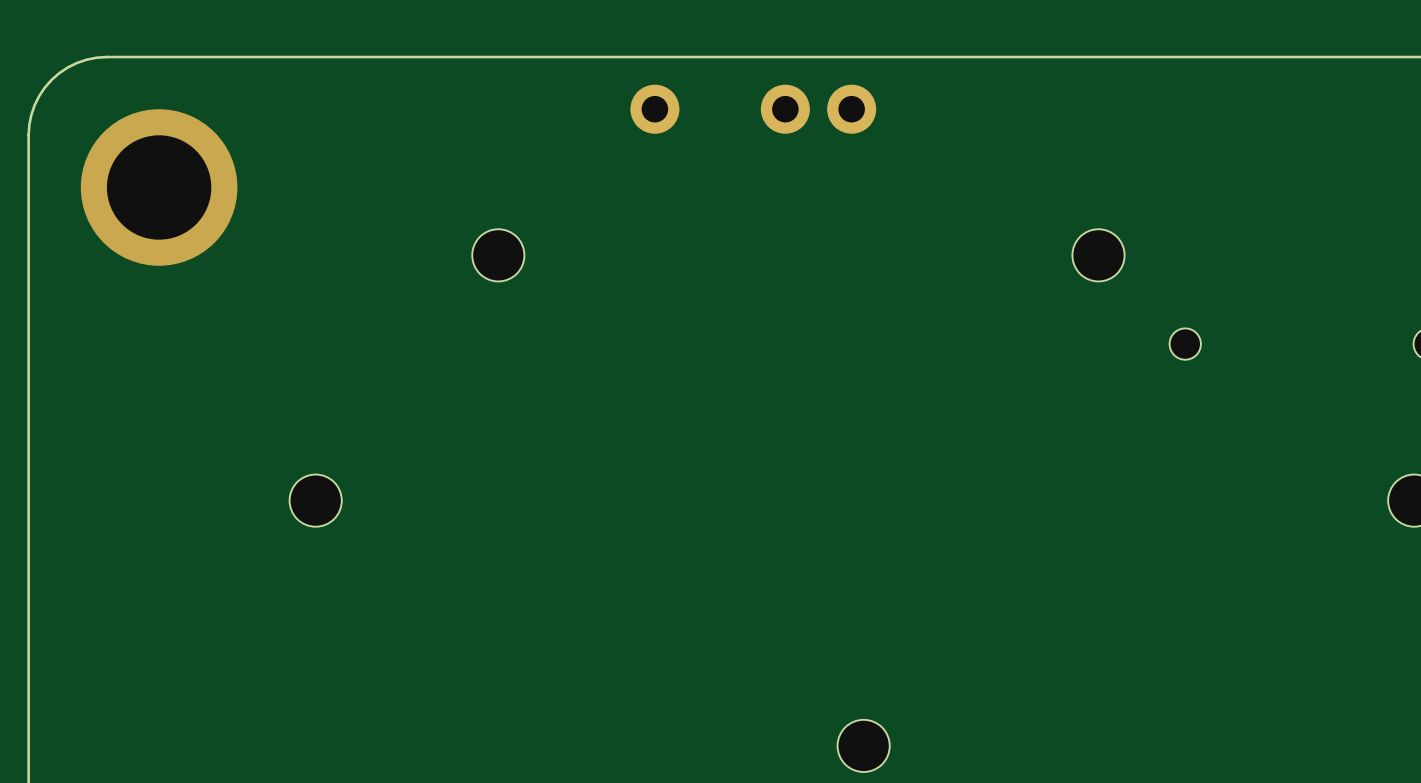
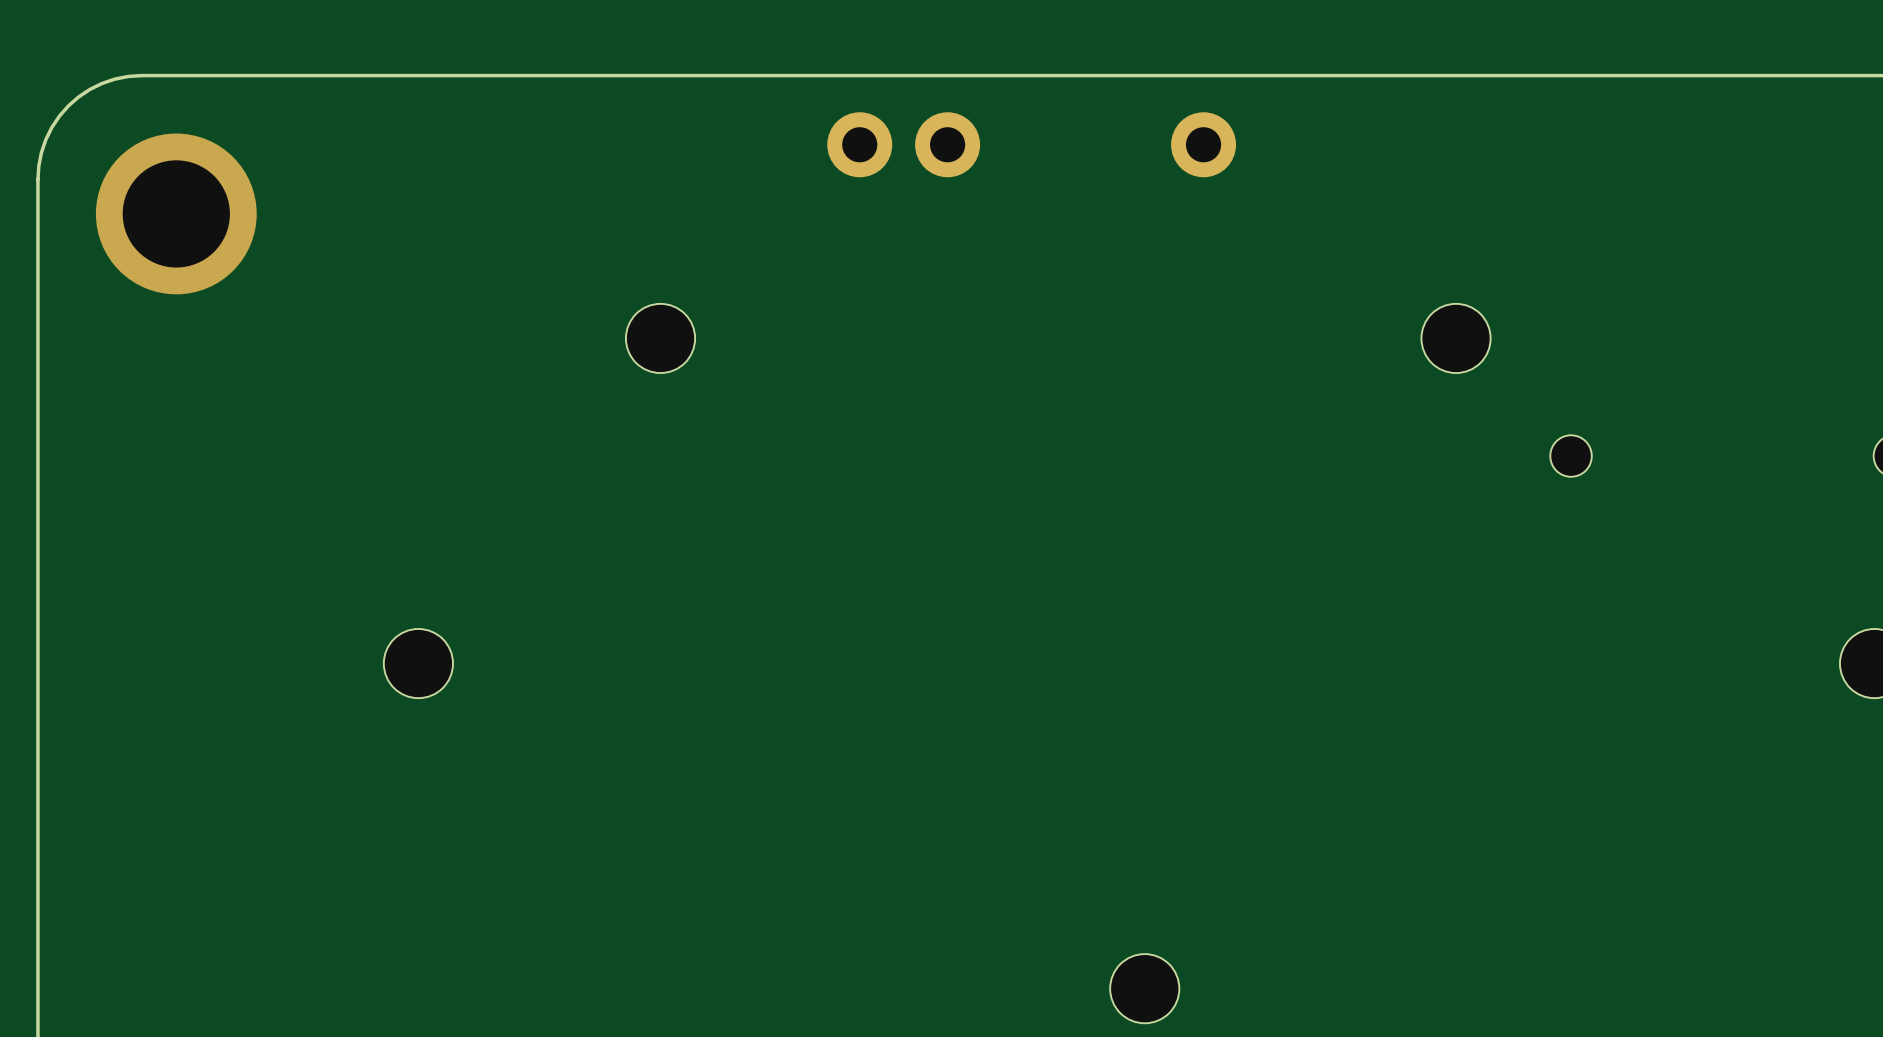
part position: (654, 109) -> (1203, 144)
part position: (818, 109) -> (903, 144)
via: none -> (176, 213)
via: (159, 187) -> none

